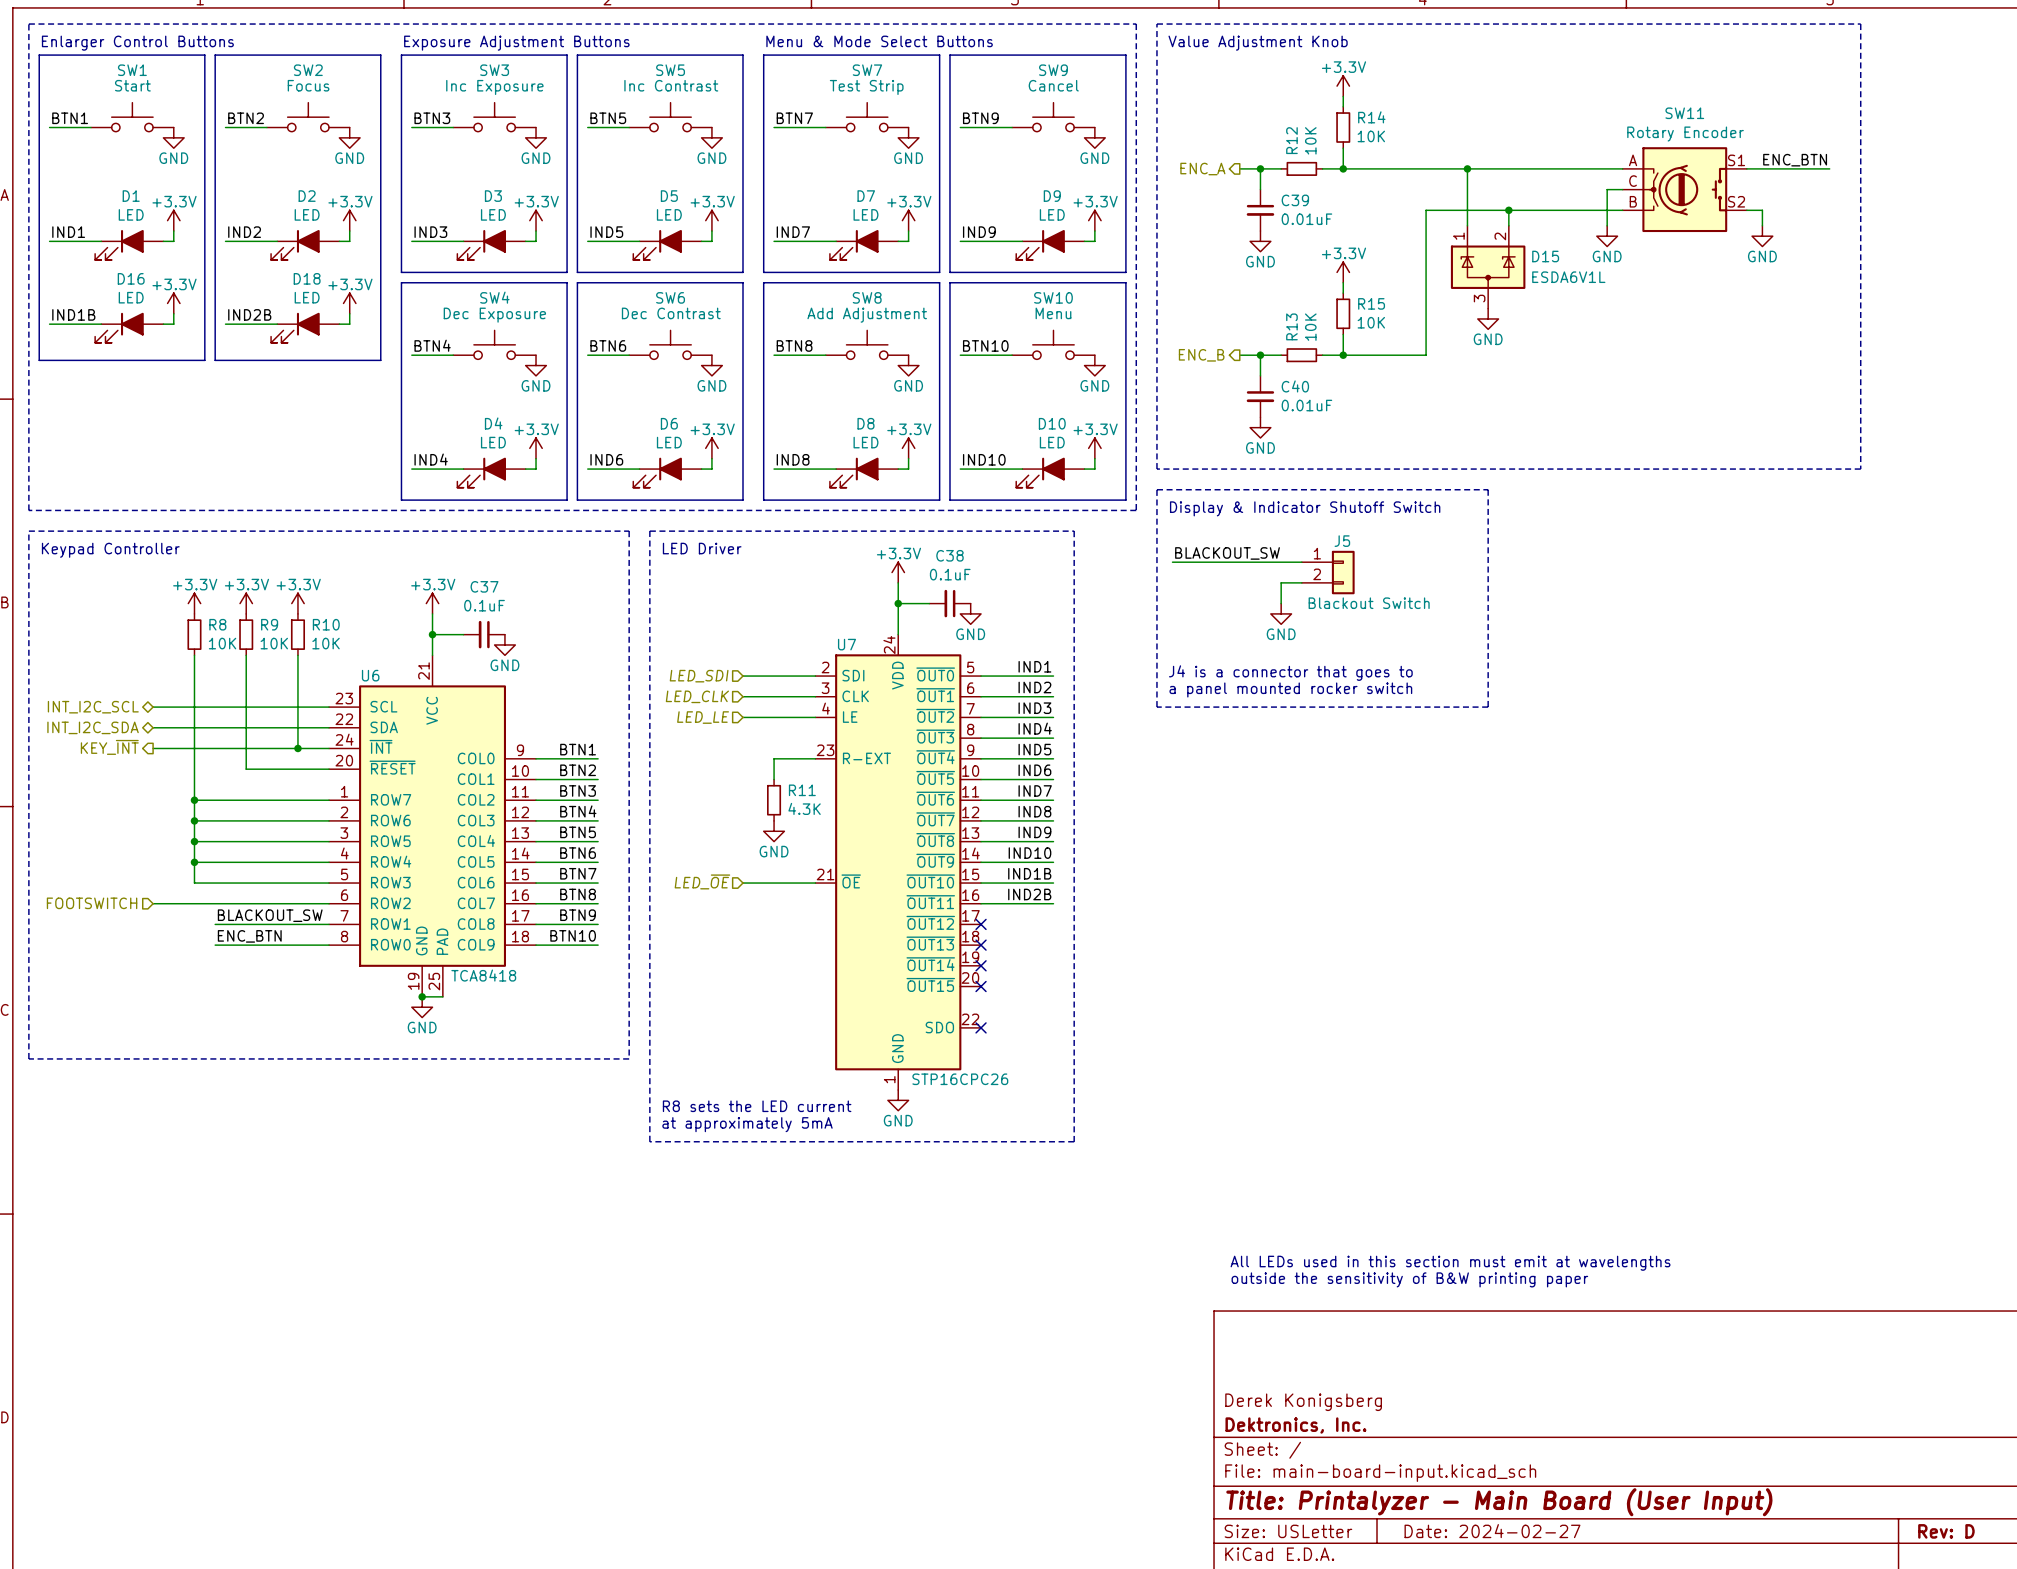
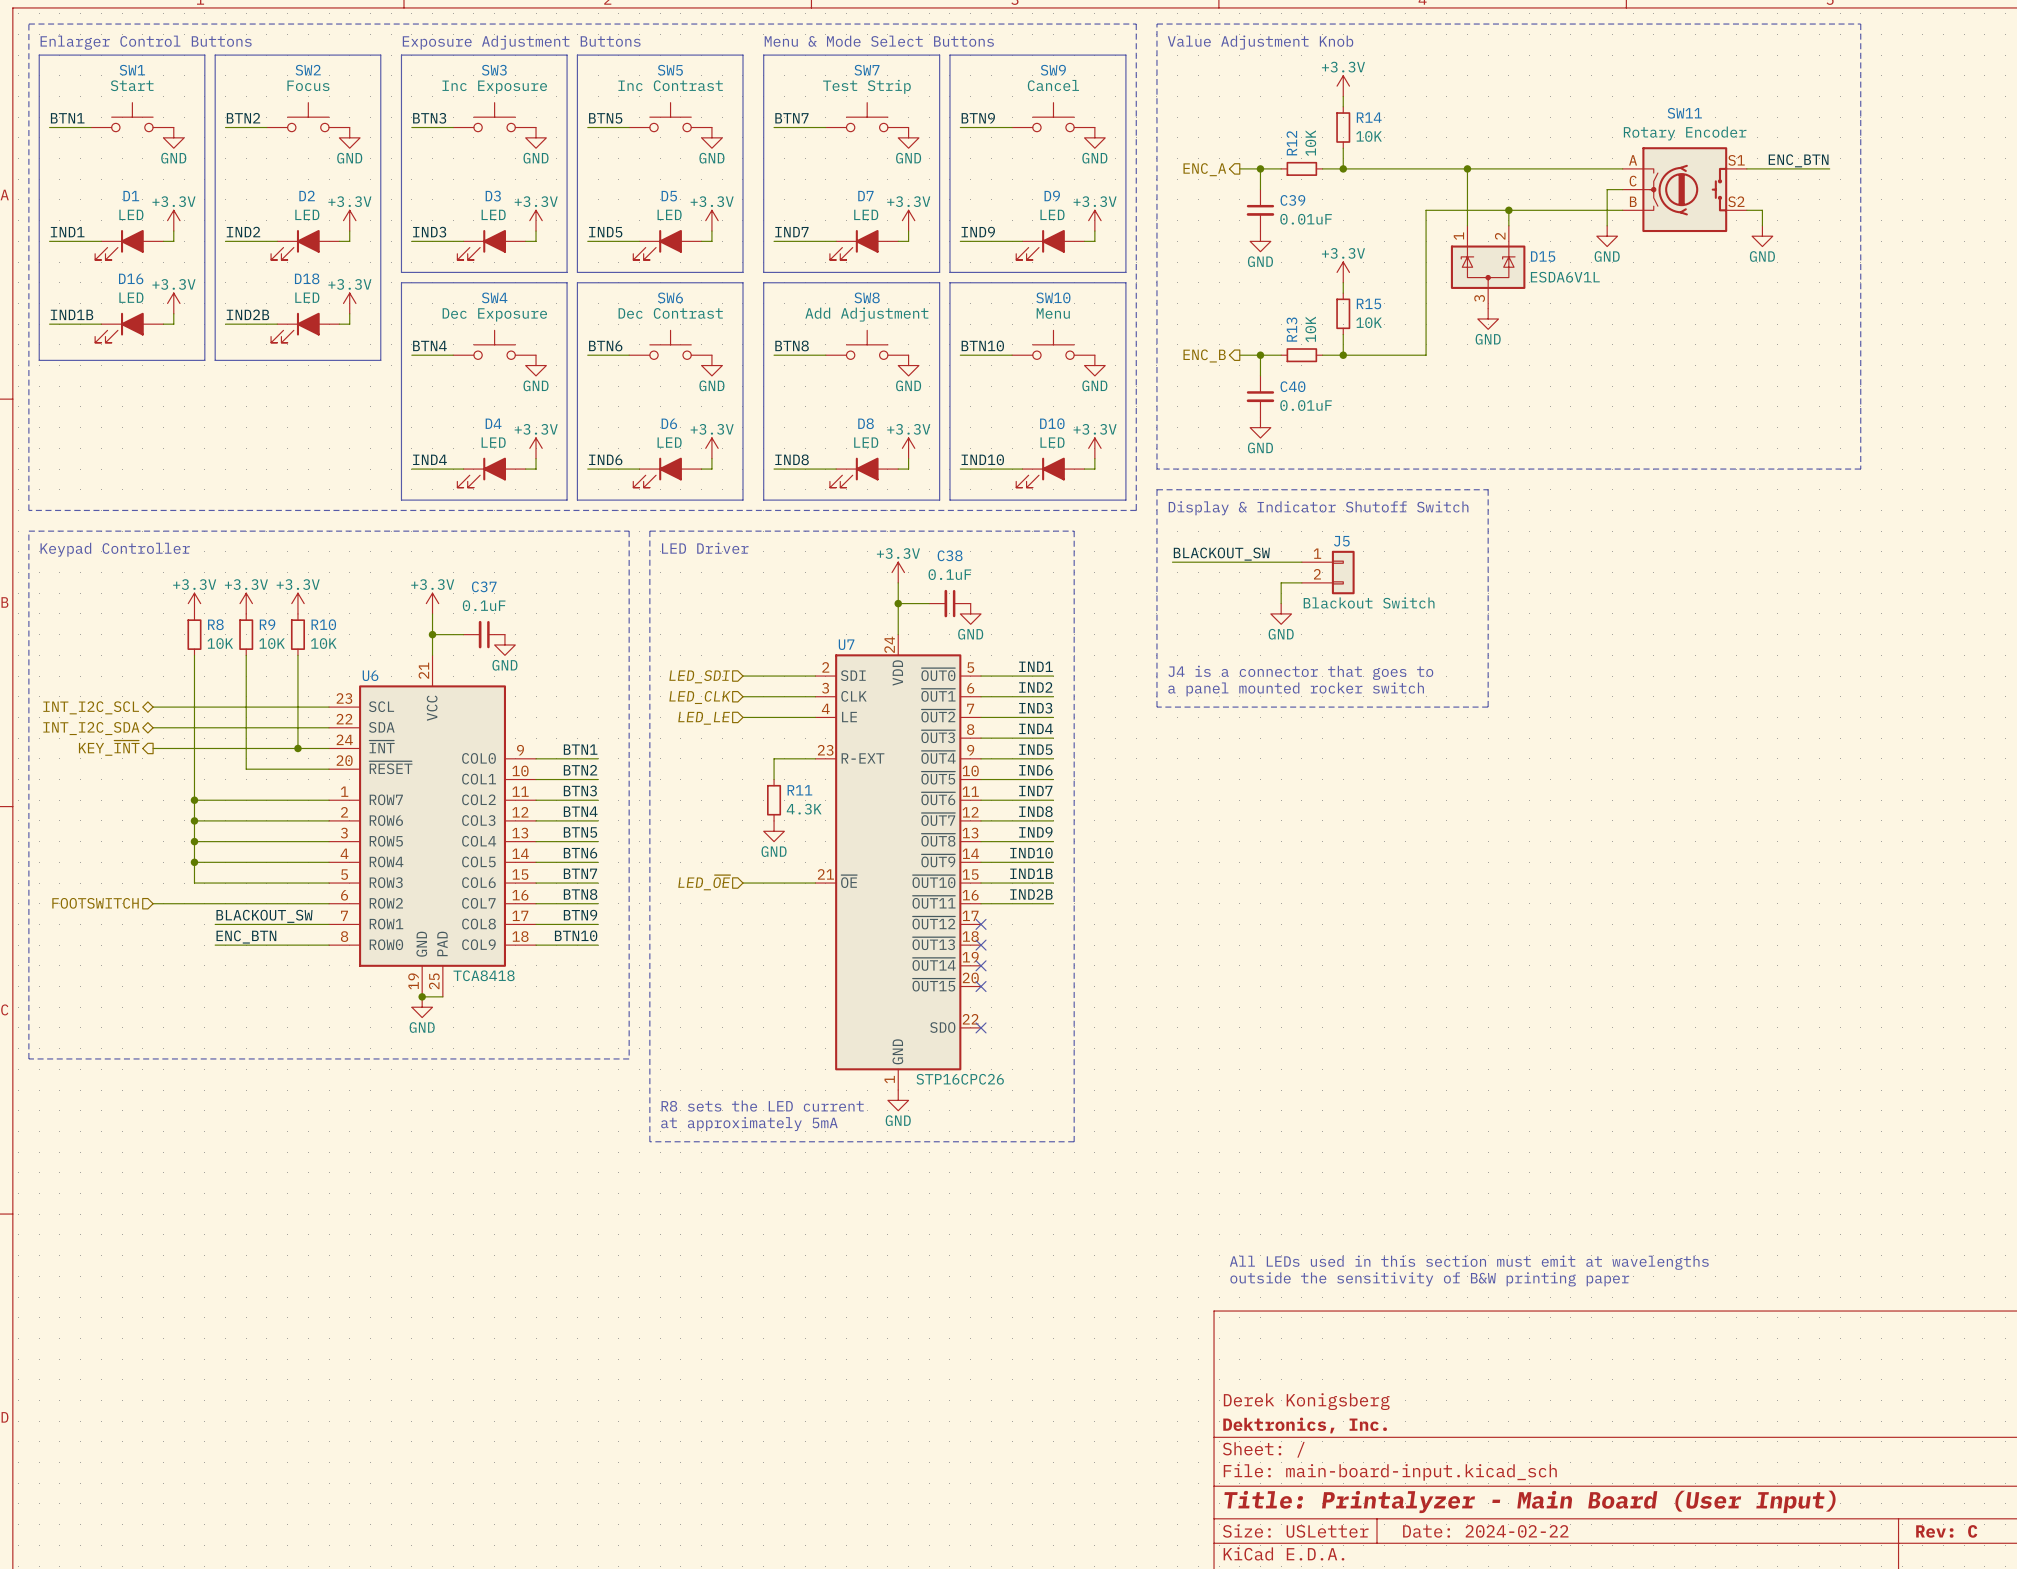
title block: Date: 2024-02-27 (1492, 1531) -> Date: 2024-02-22 (1485, 1531)
title block: Rev: D (1946, 1531) -> Rev: C (1946, 1531)

